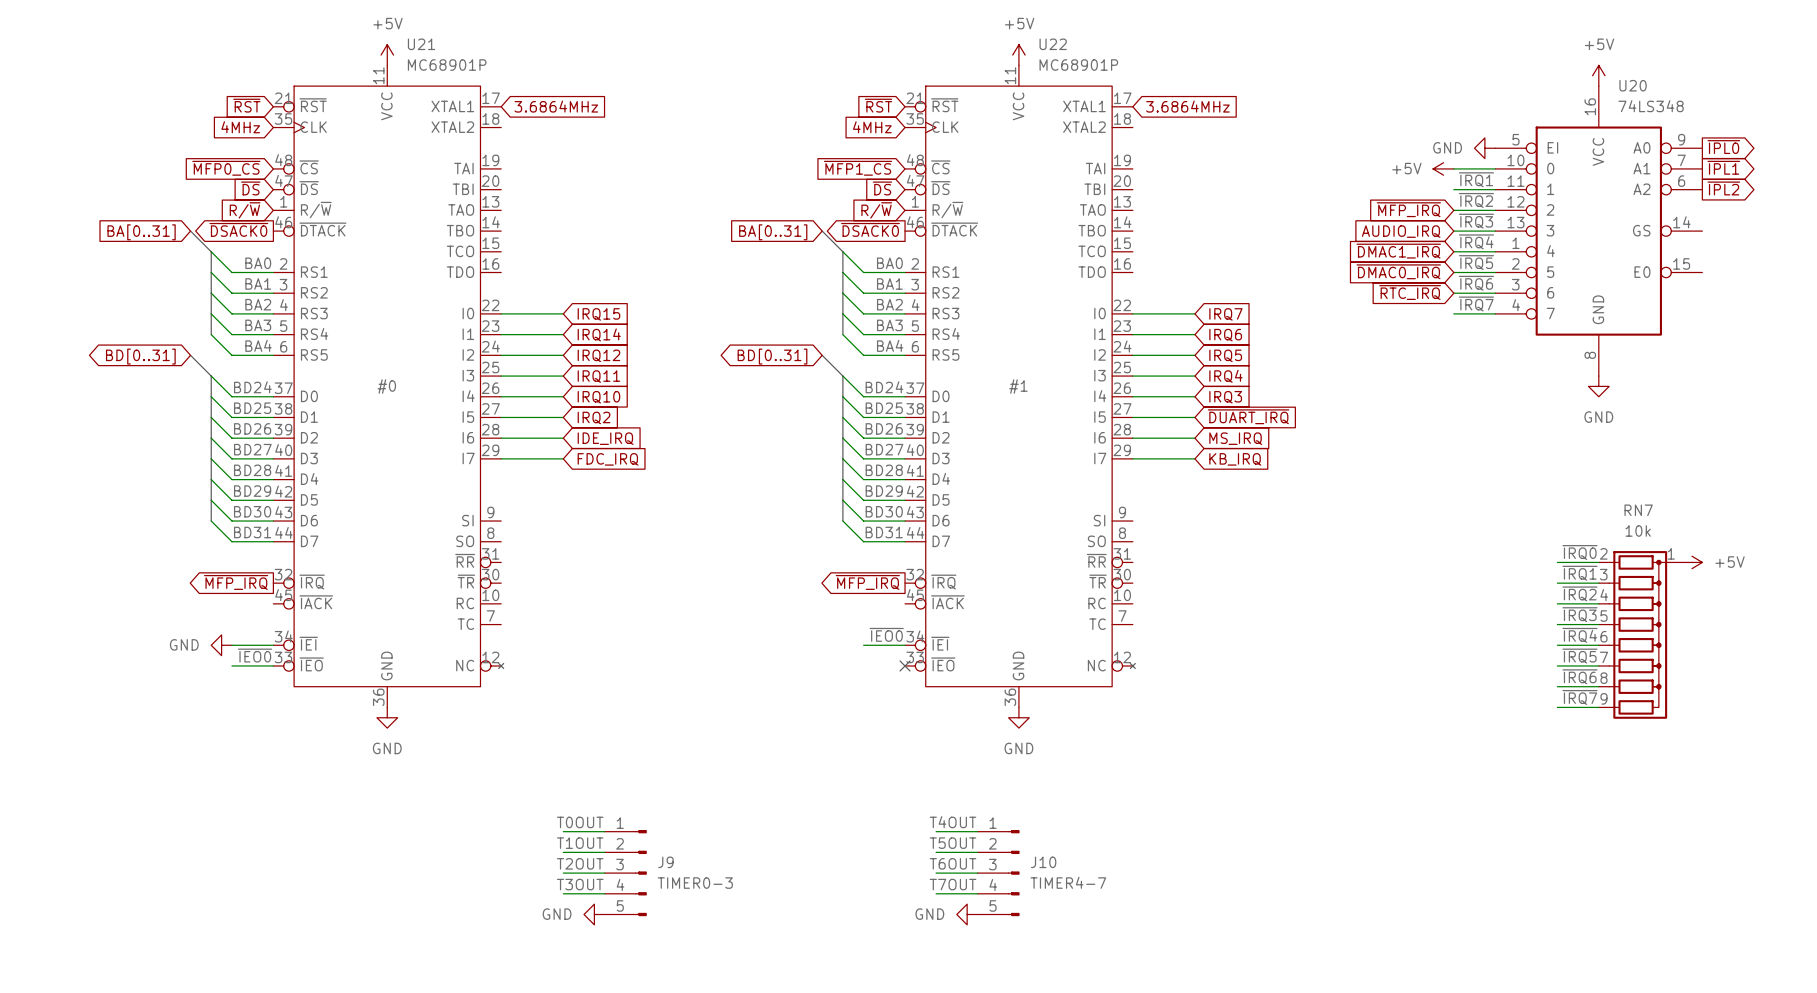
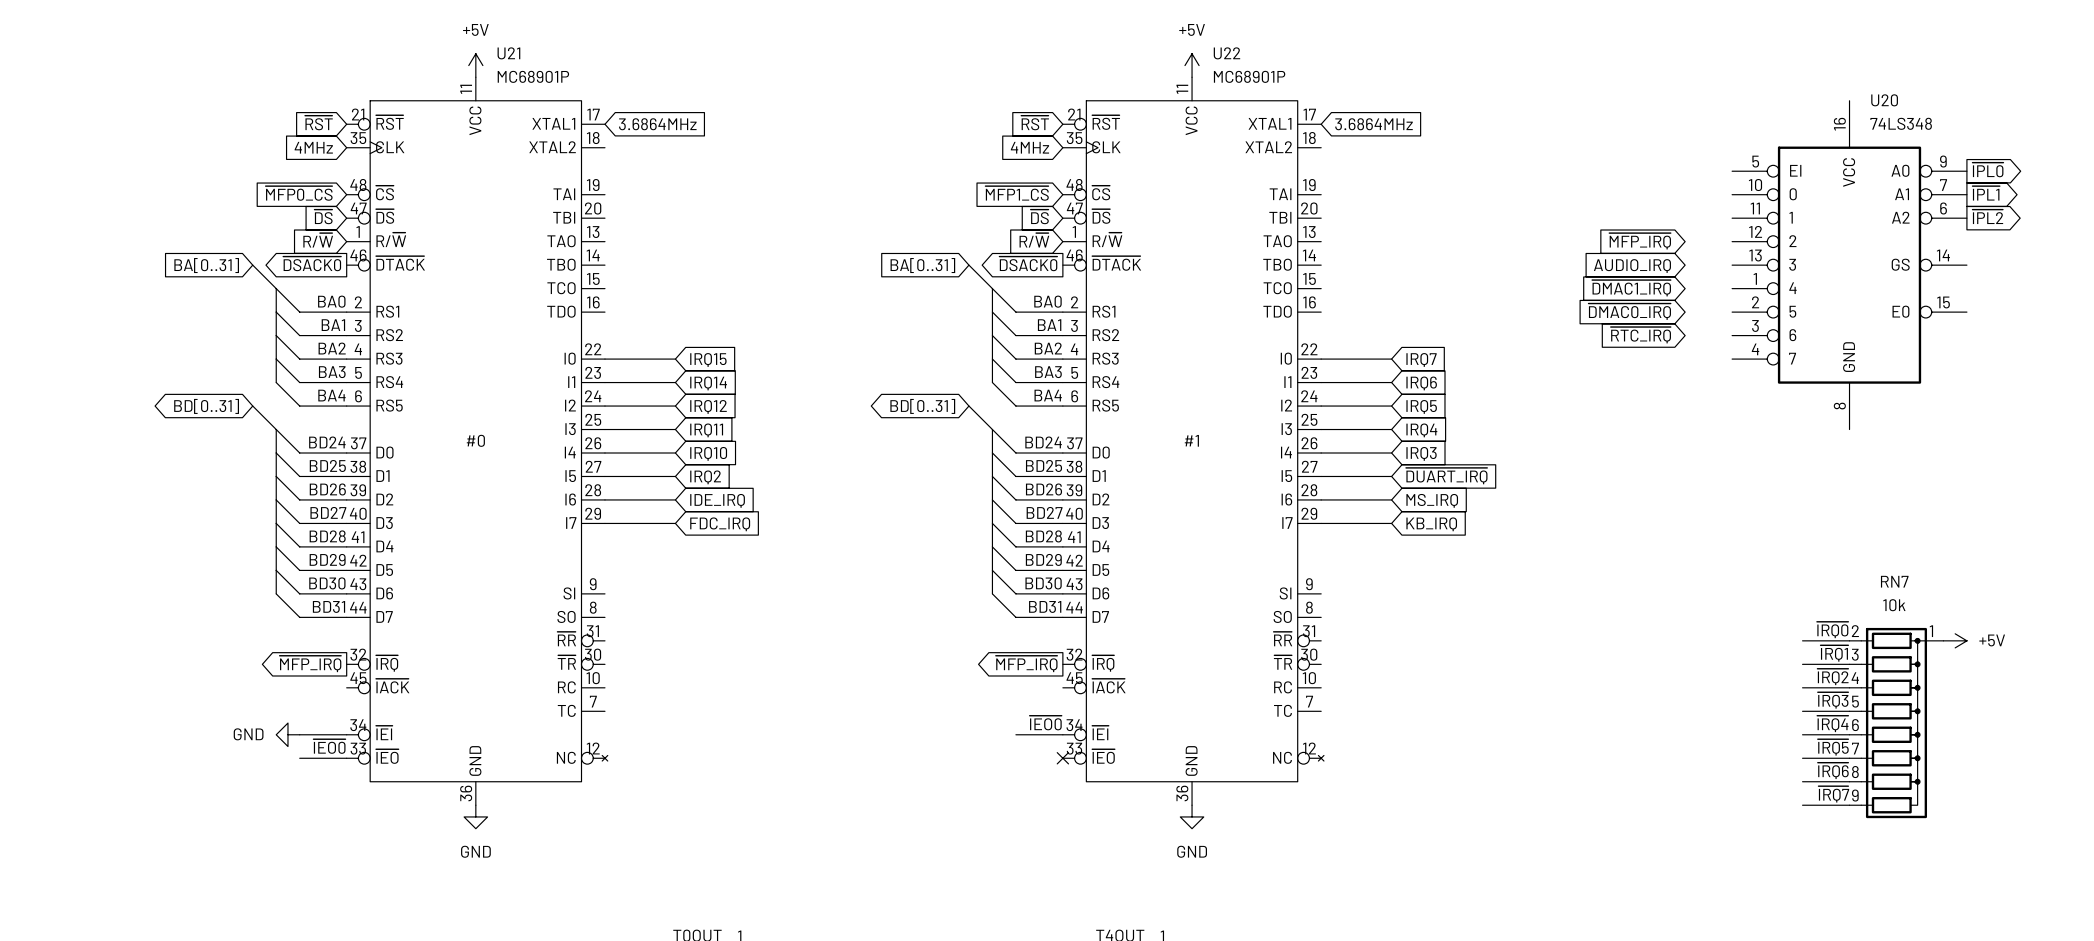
power symbol: +5V (1598, 75) -> none
power symbol: GND (1484, 148) -> none
power symbol: +5V (1443, 168) -> none
wire: (1453, 168) (1495, 168) -> none
label: ~{IRQ1} (1476, 179) -> none
wire: (1453, 189) (1495, 189) -> none
label: ~{IRQ2} (1476, 200) -> none
wire: (1453, 210) (1495, 210) -> none
label: ~{IRQ3} (1476, 221) -> none
wire: (1453, 231) (1495, 231) -> none
label: ~{IRQ4} (1476, 241) -> none
wire: (1453, 251) (1495, 251) -> none
label: ~{IRQ5} (1476, 262) -> none
wire: (1453, 272) (1495, 272) -> none
label: ~{IRQ6} (1476, 283) -> none
wire: (1453, 293) (1495, 293) -> none
label: ~{IRQ7} (1476, 303) -> none
wire: (1453, 313) (1495, 313) -> none
power symbol: GND (1598, 386) -> none

